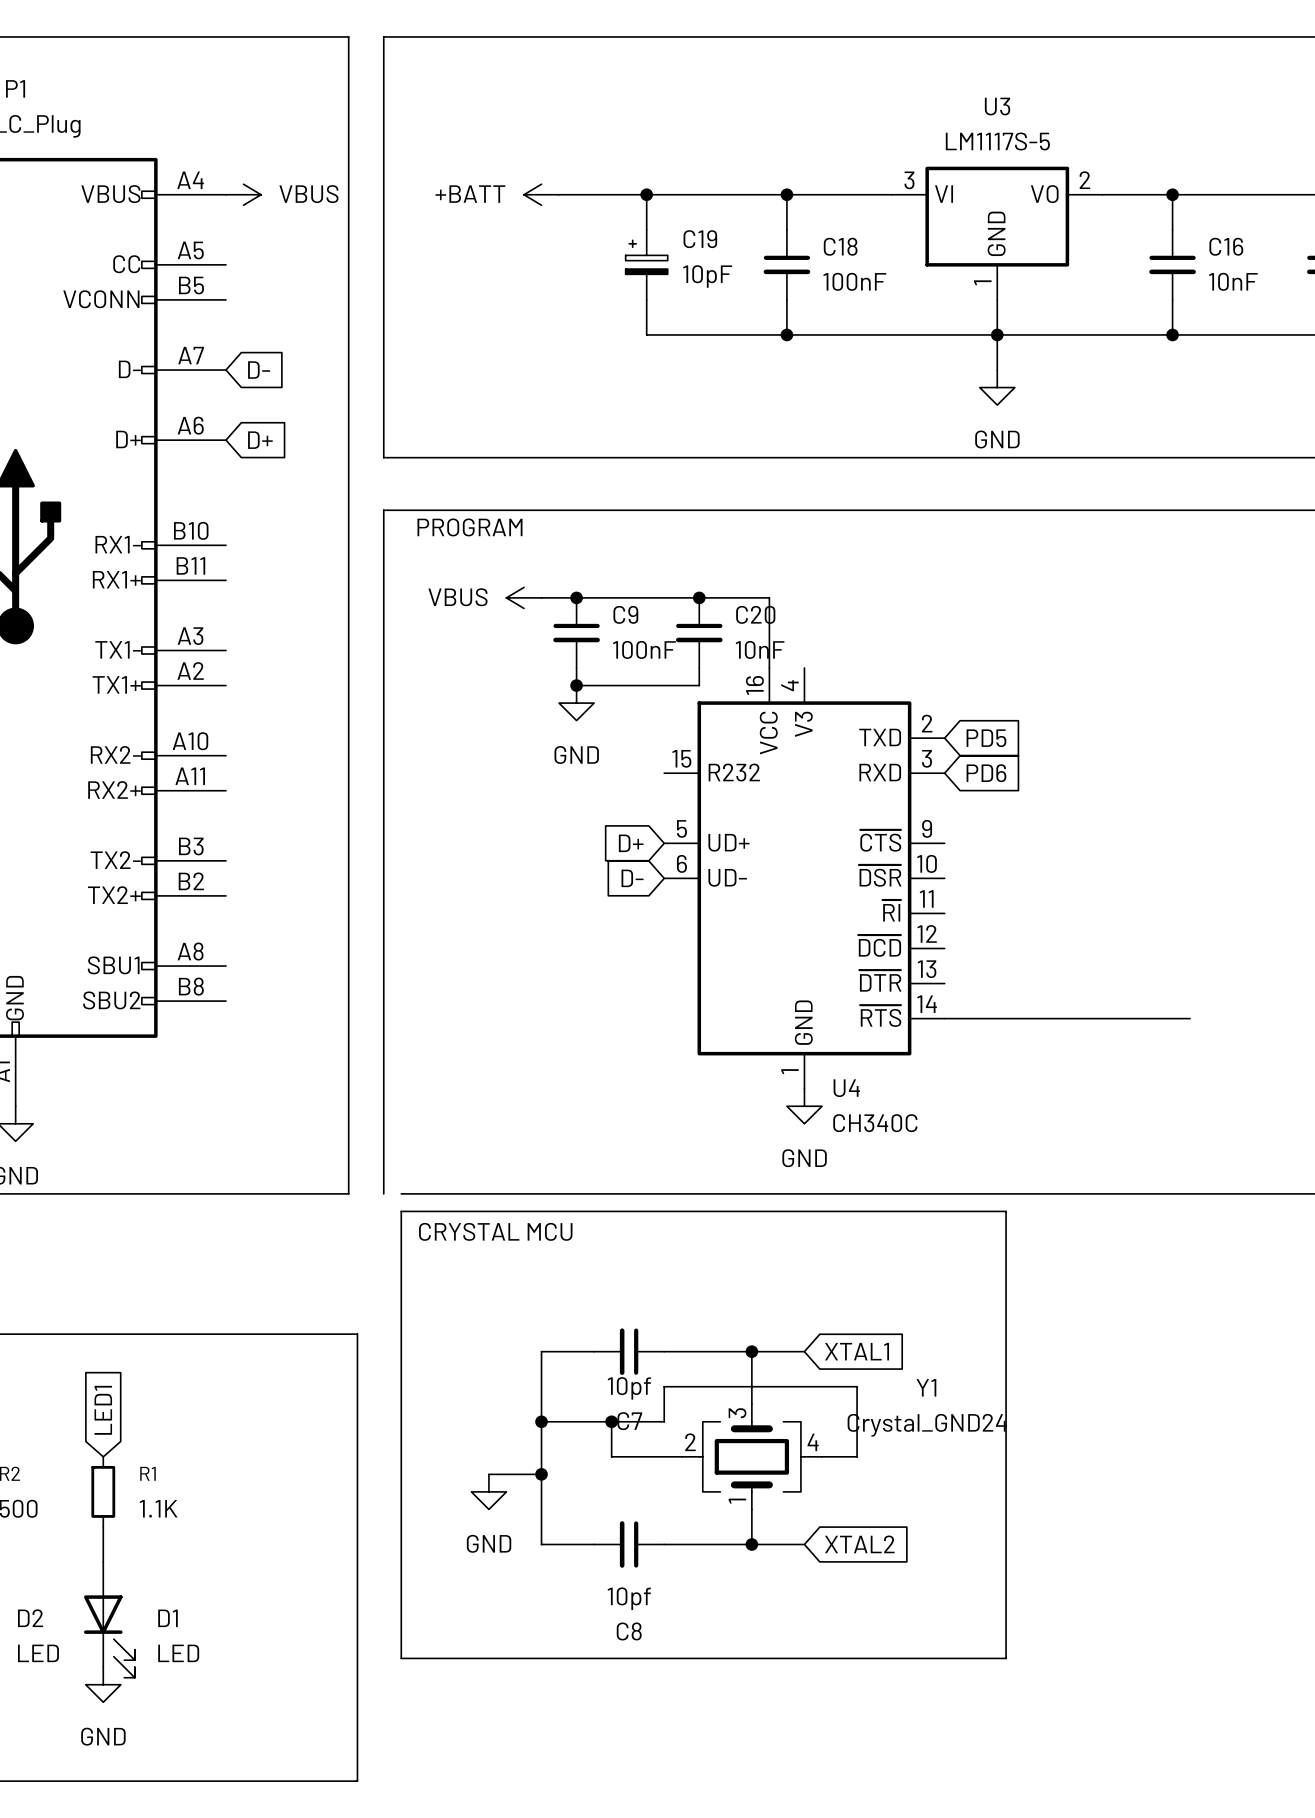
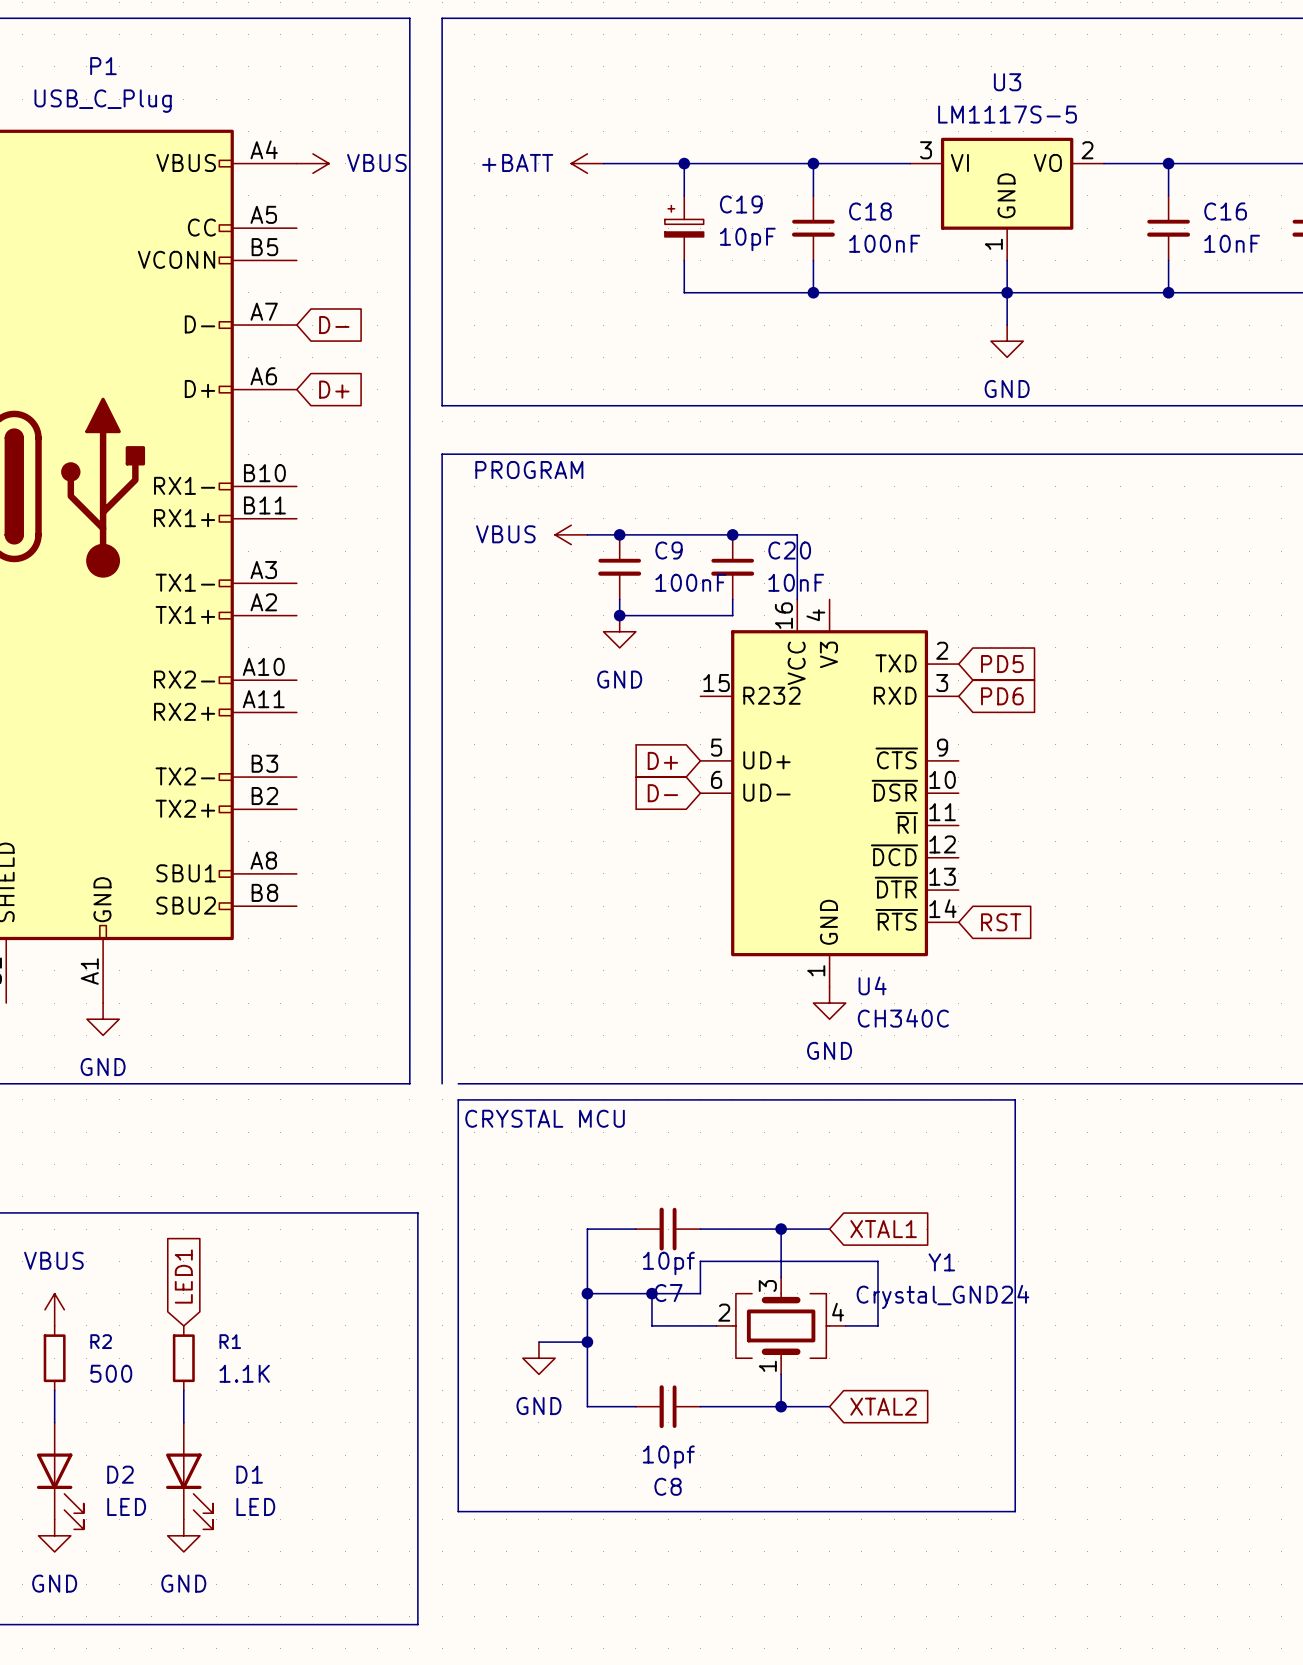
wire: (944, 1018) (1190, 1018) -> none
global label: none -> RST (1001, 922)

